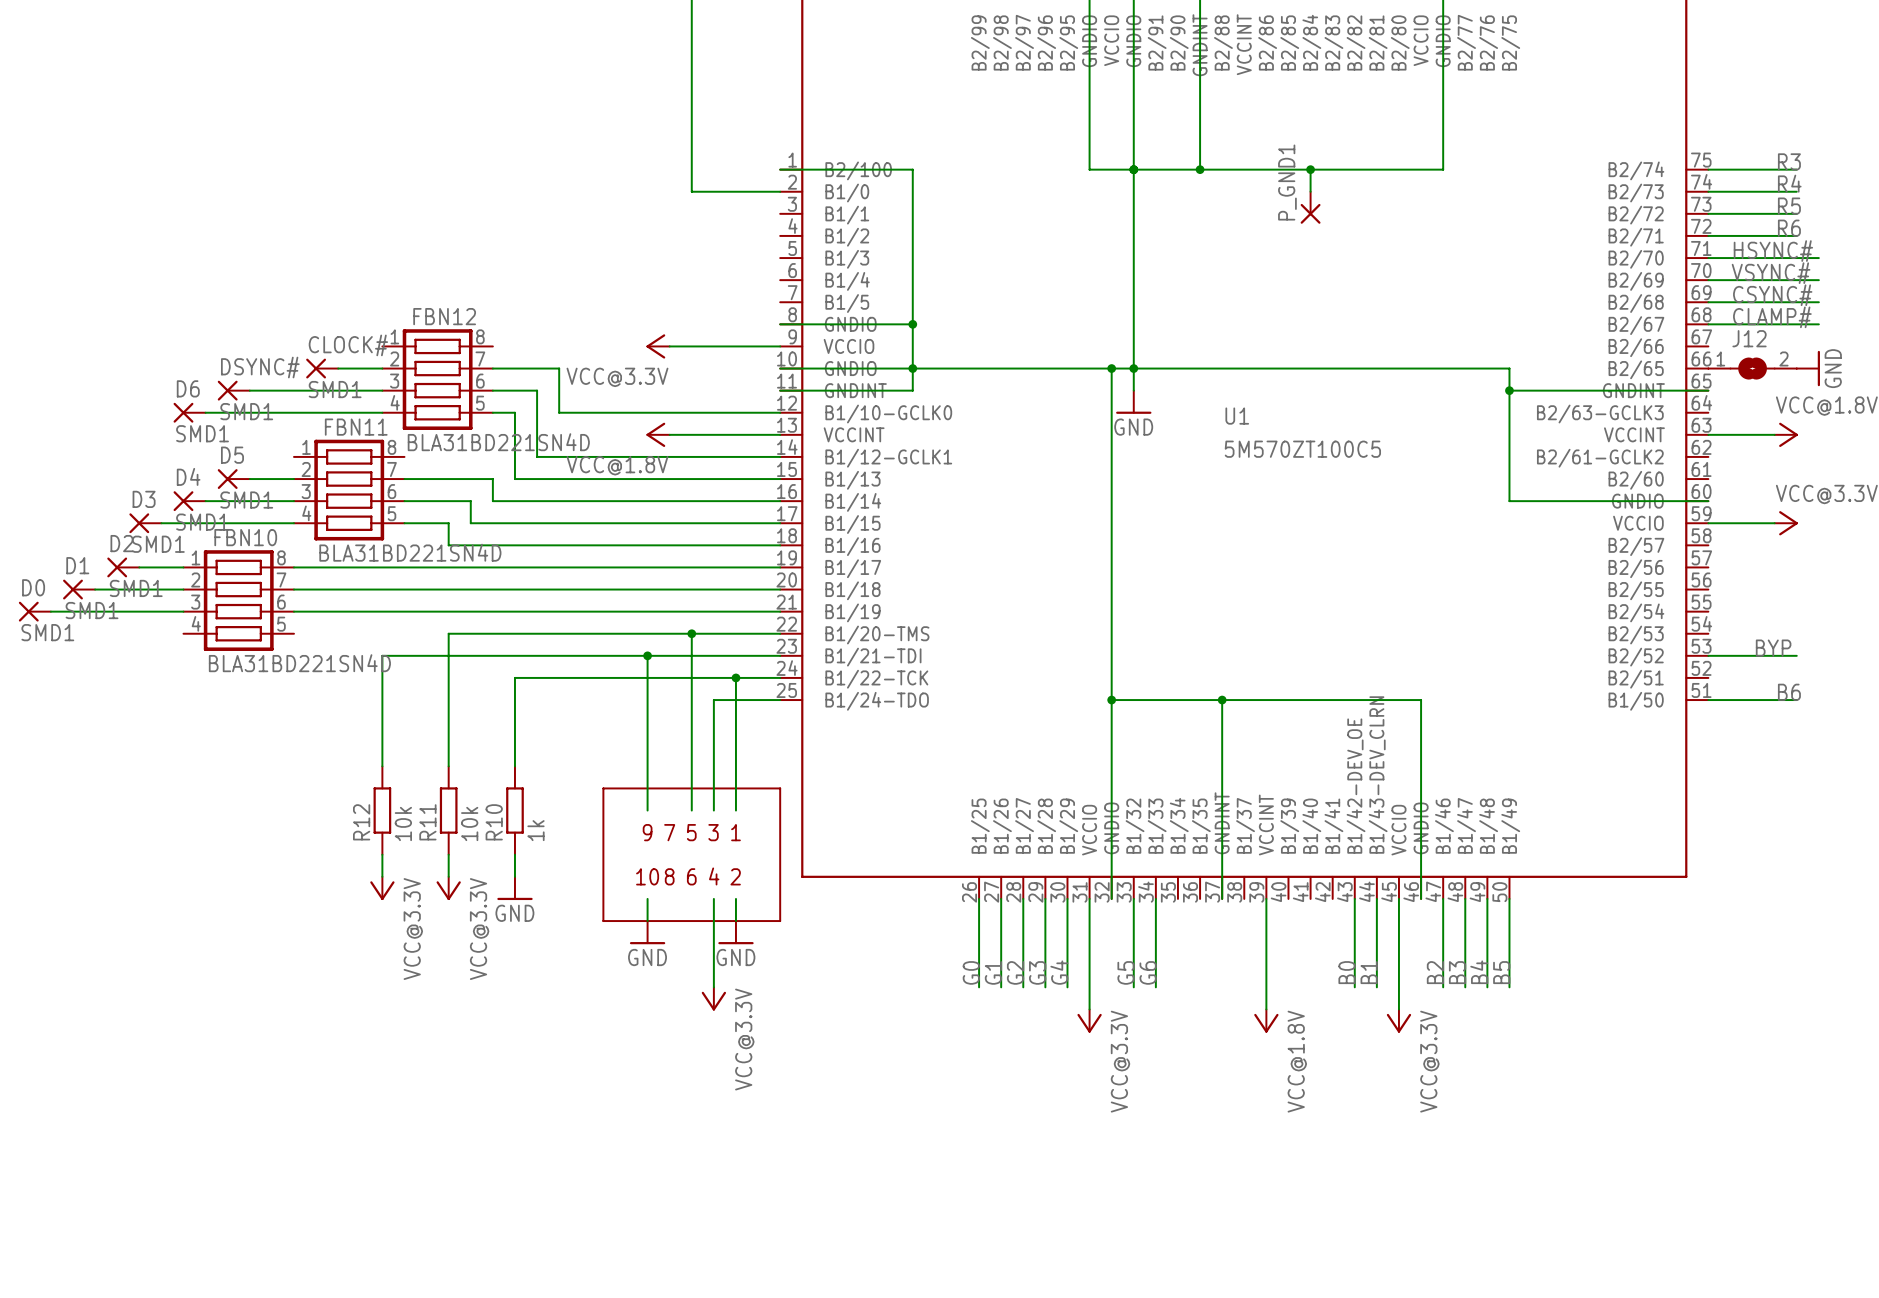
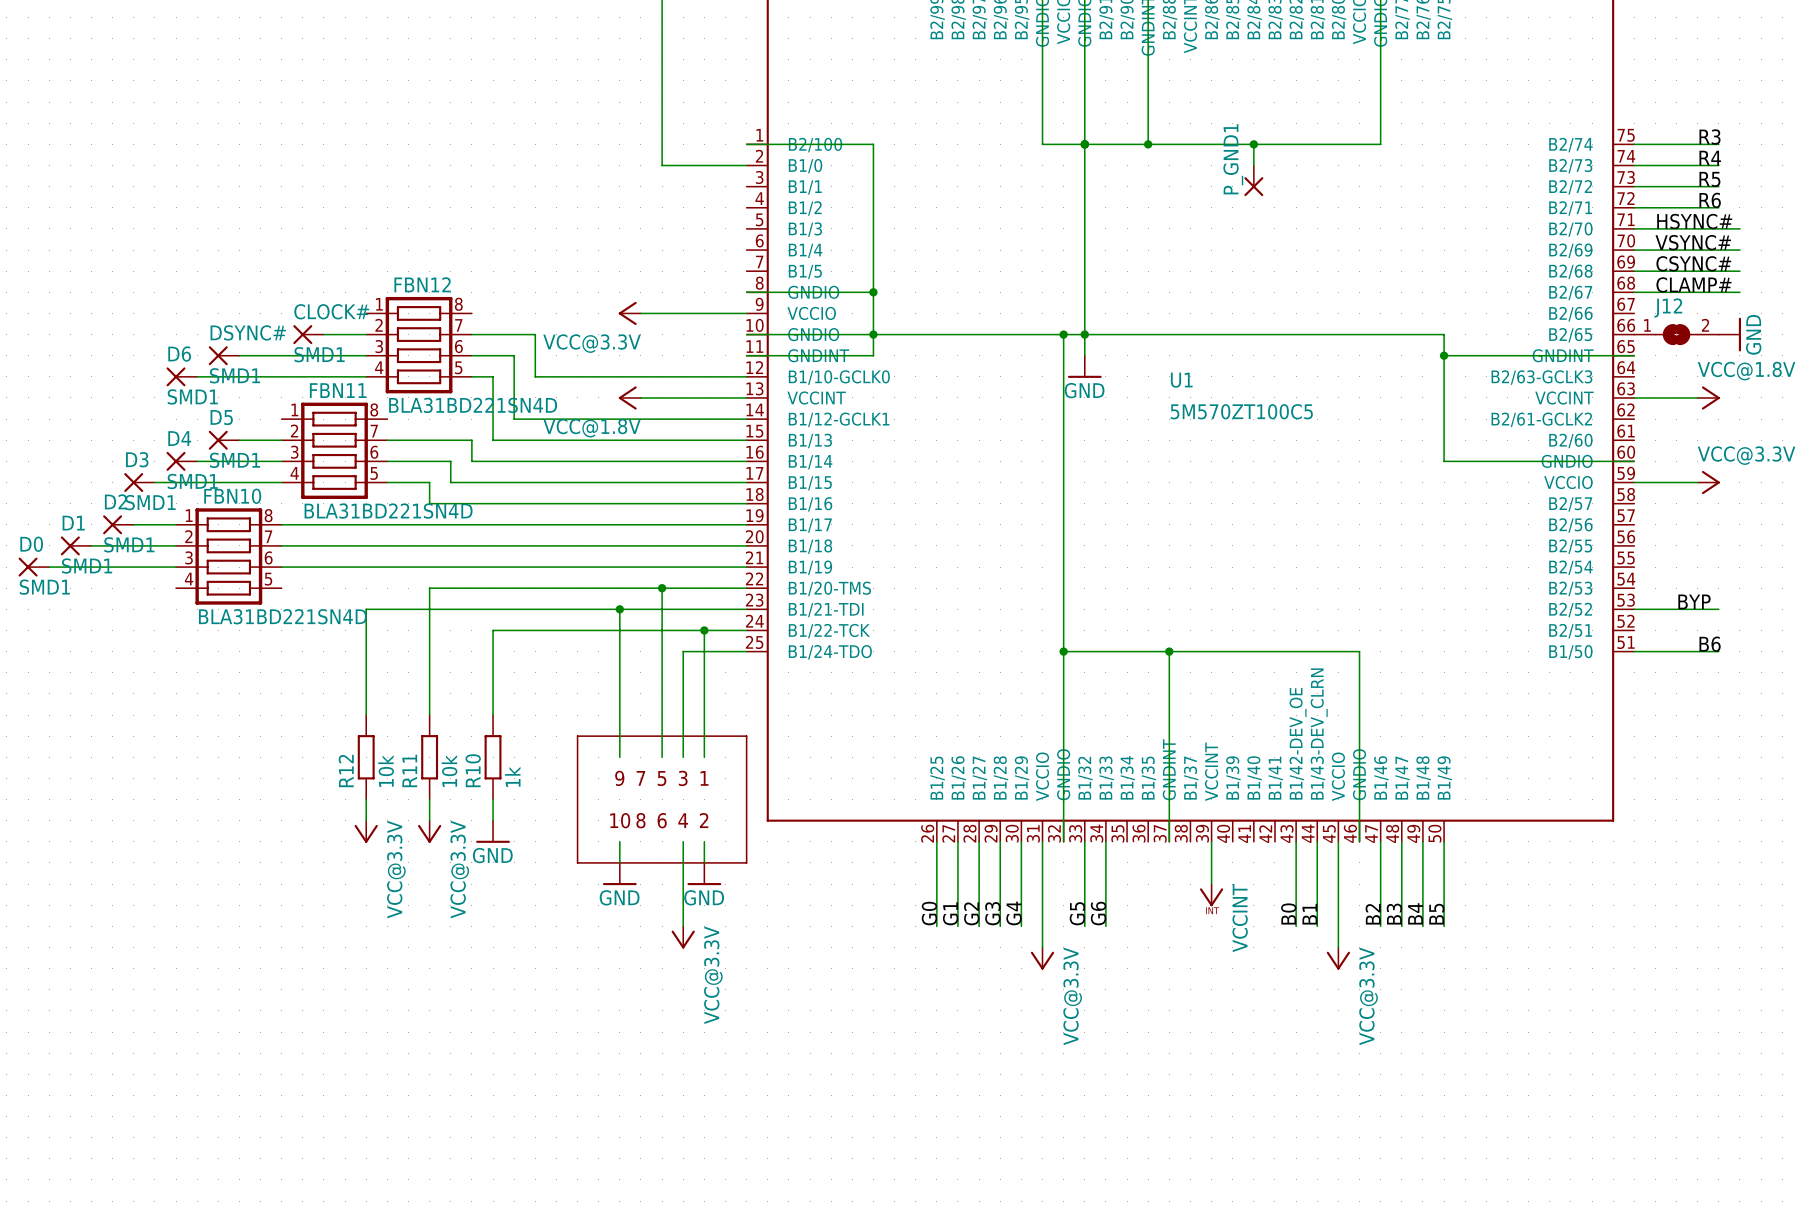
wire: (1266, 943) (1266, 1009) -> none
power symbol: none -> VCCINT (1211, 895)
power symbol: VCC@1.8V (1266, 1021) -> none

